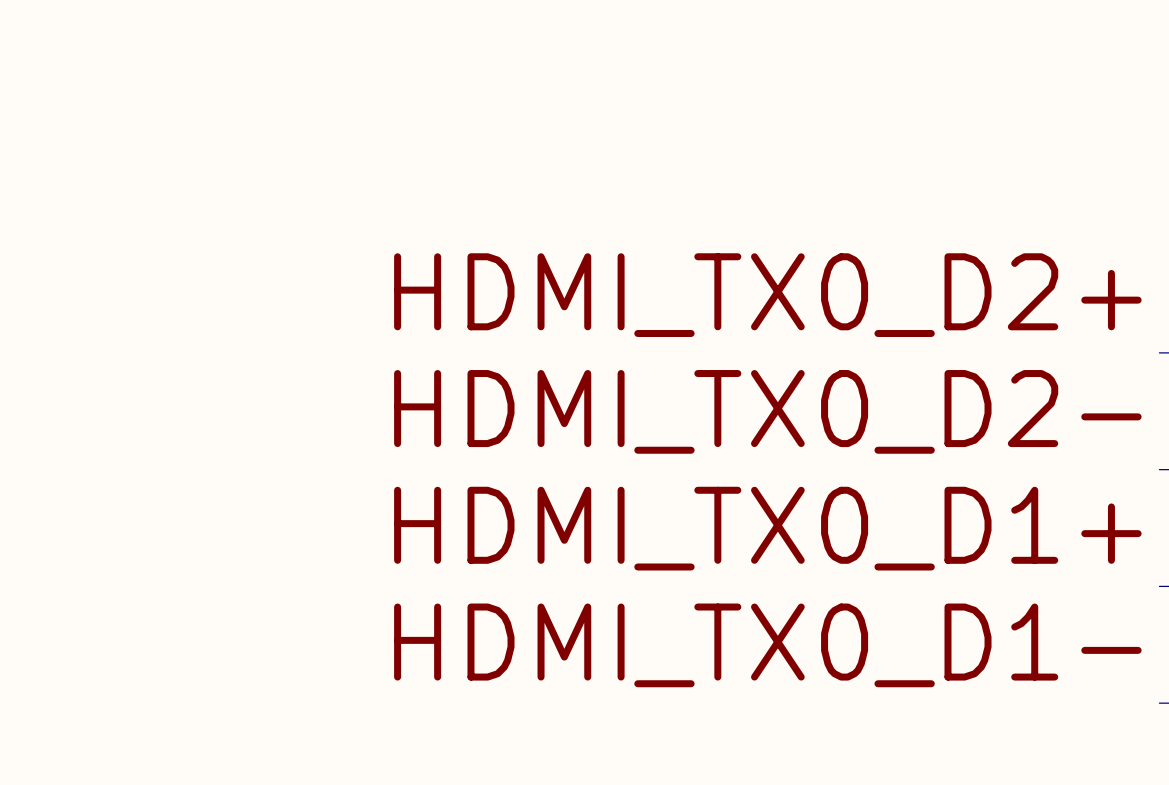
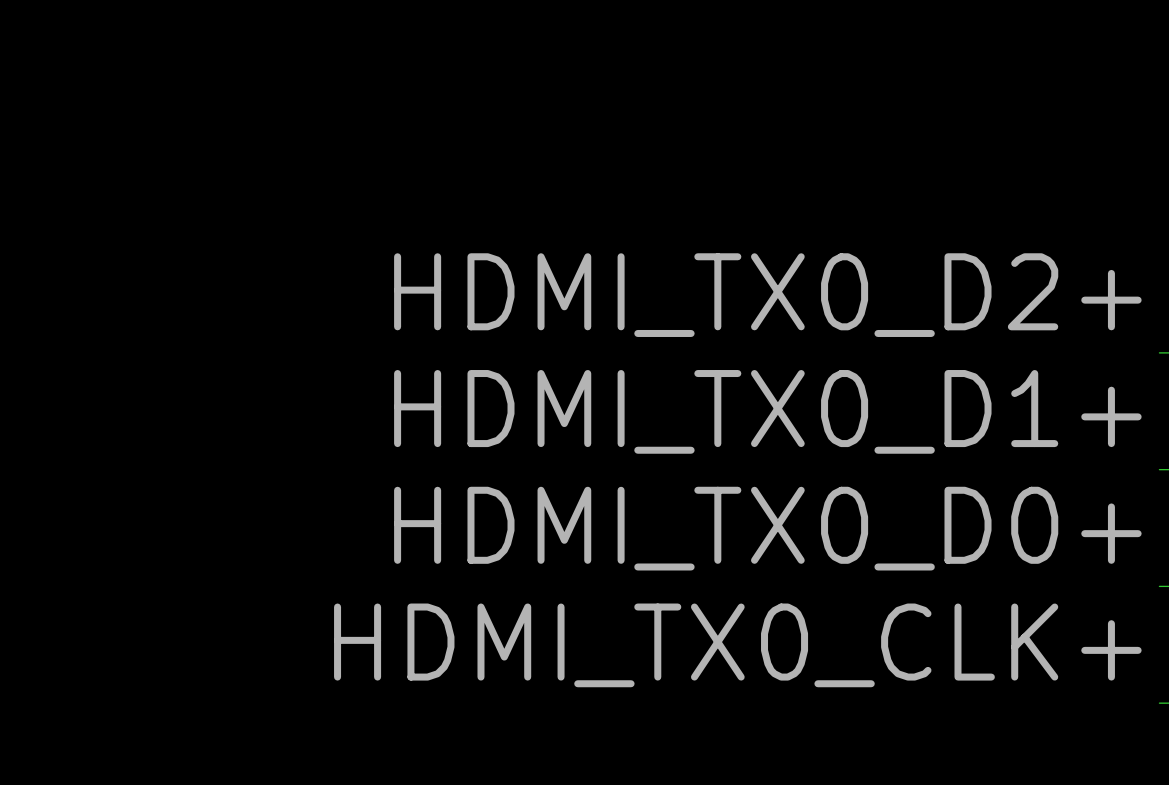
label: HDMI_TX0_D2- (767, 411) -> HDMI_TX0_D1+ (767, 411)
label: HDMI_TX0_D1+ (767, 528) -> HDMI_TX0_D0+ (767, 528)
label: HDMI_TX0_D1- (767, 645) -> HDMI_TX0_CLK+ (737, 645)

